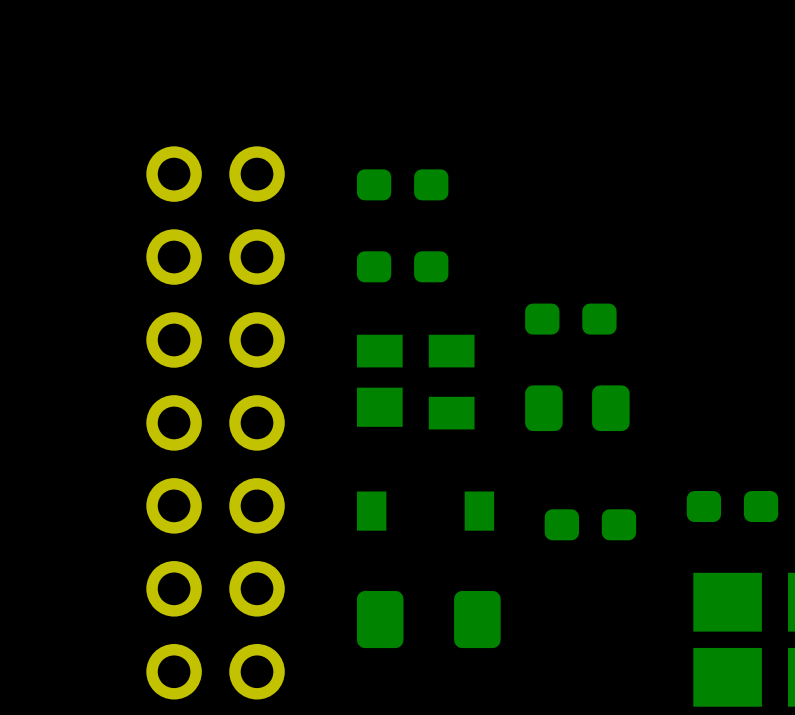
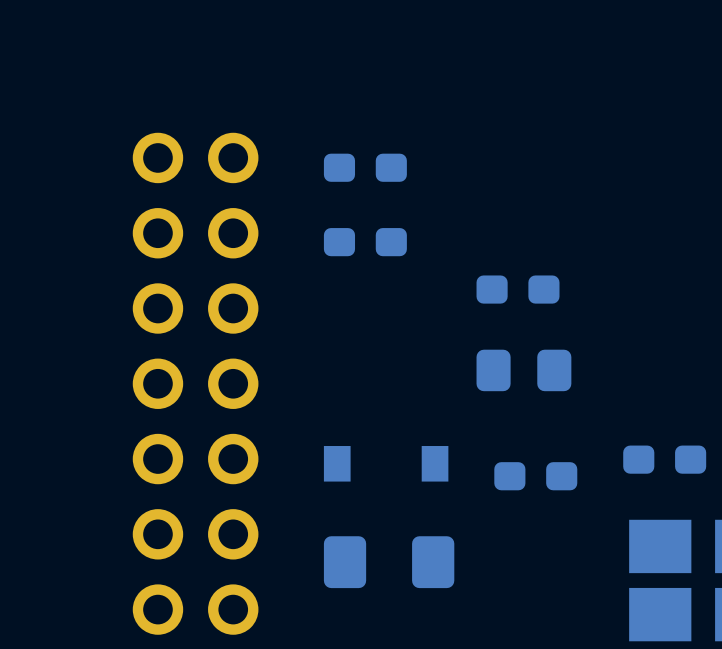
part: (415, 382) -> none

